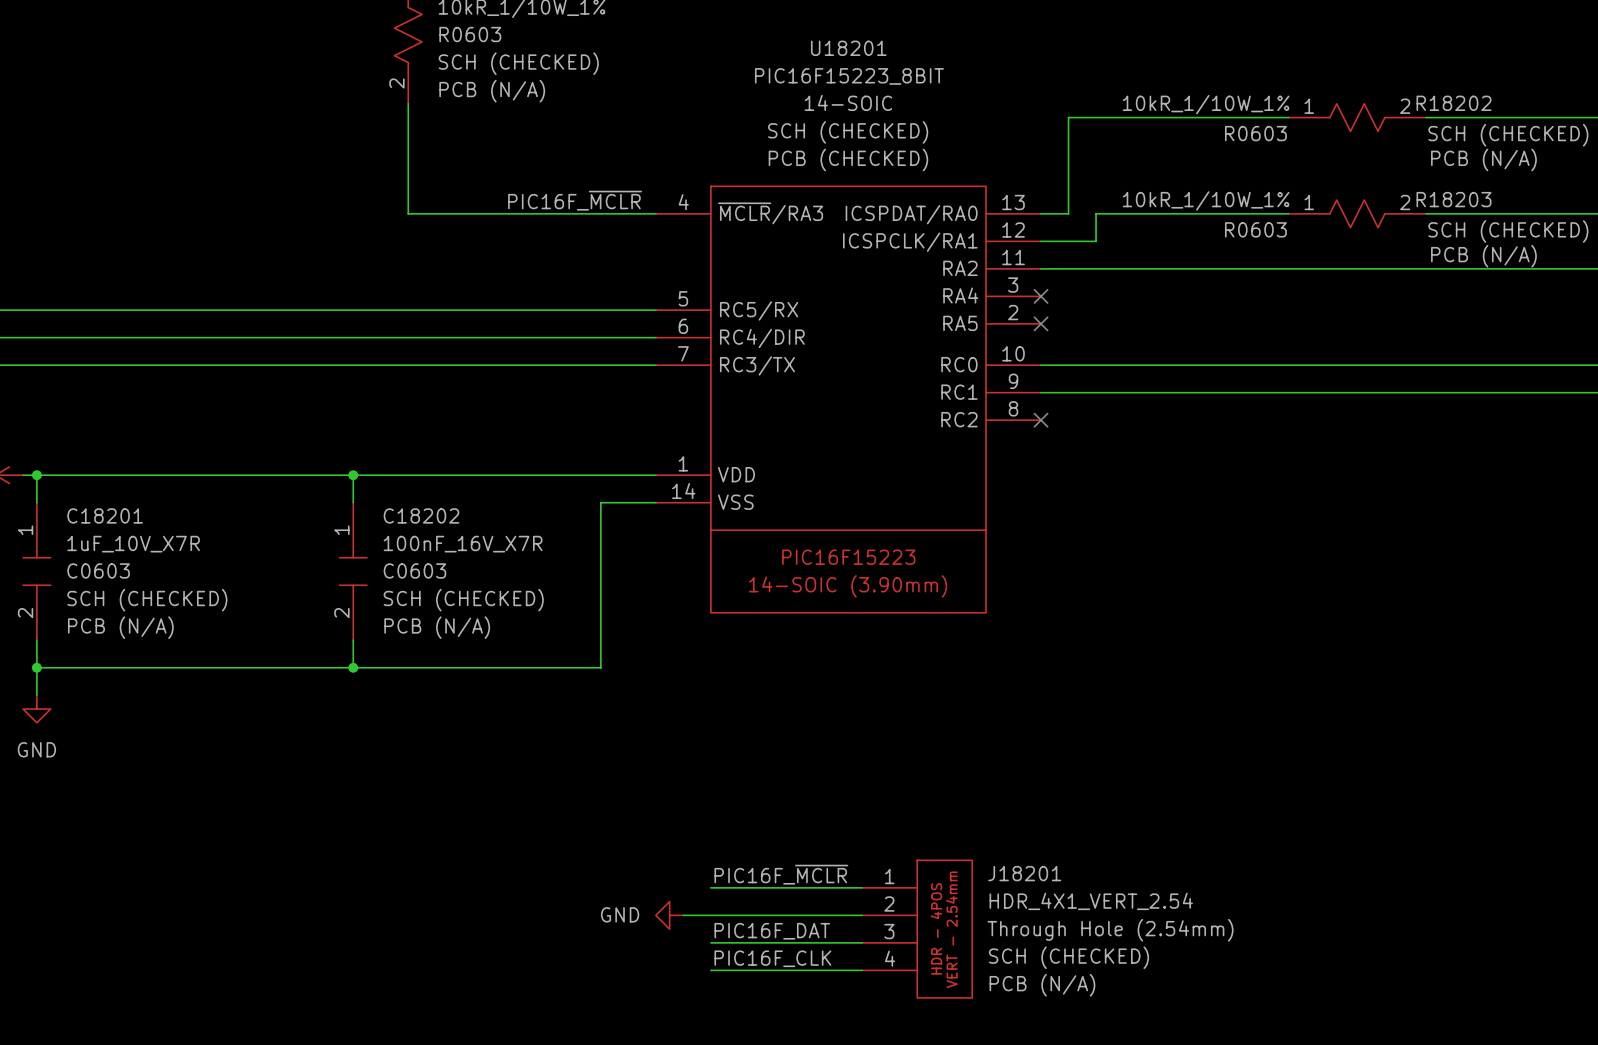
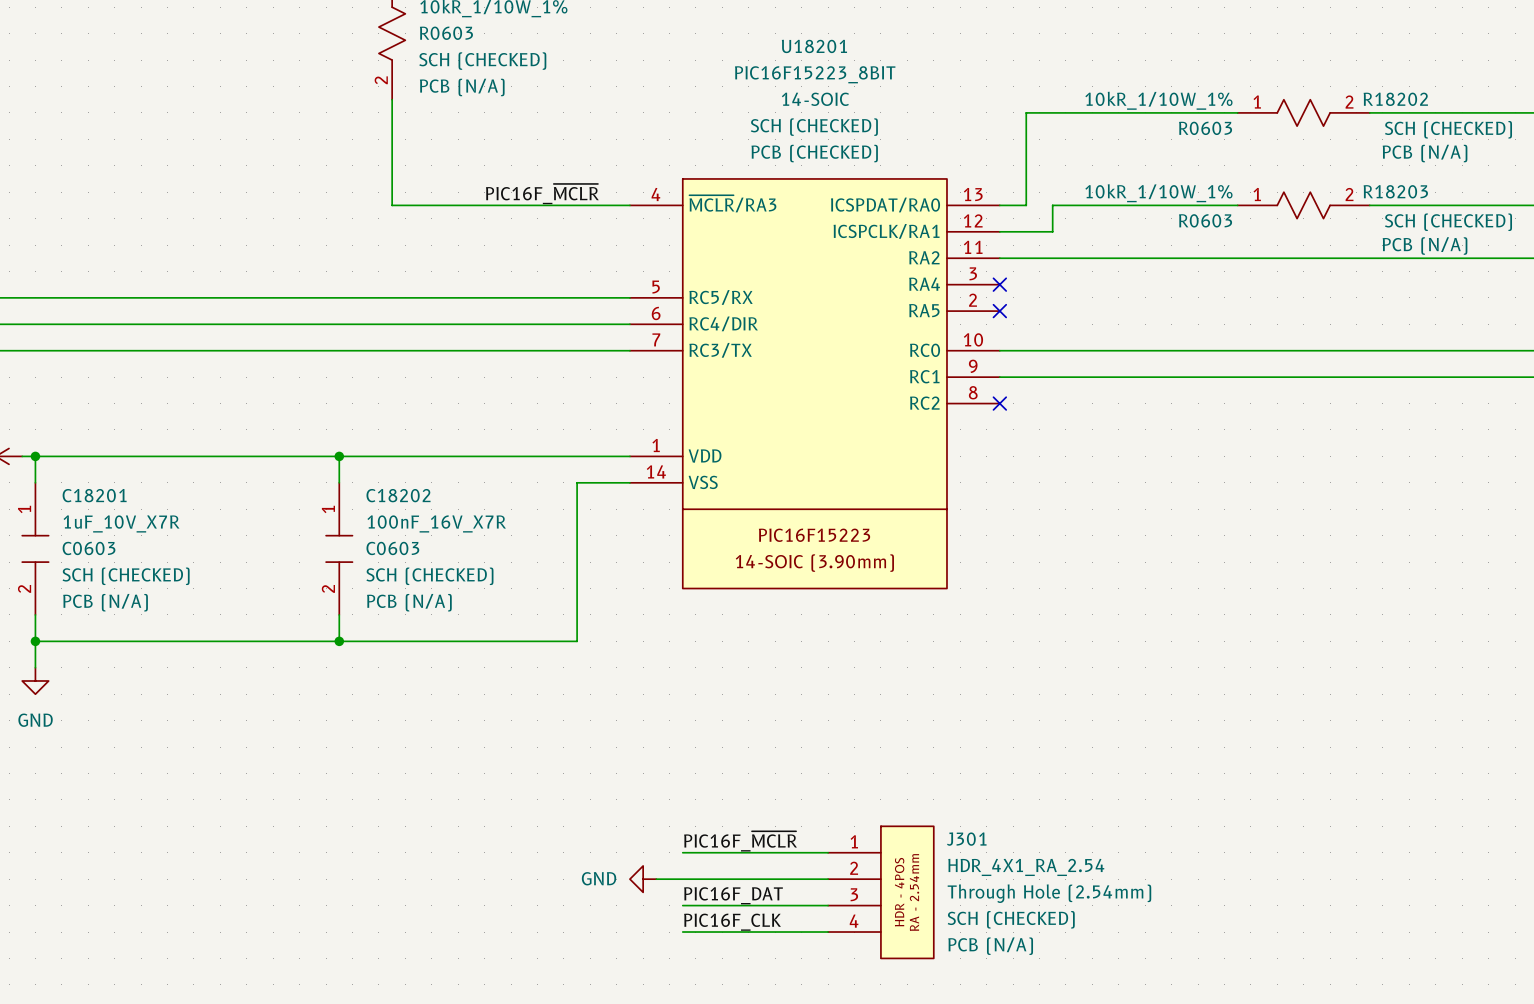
J18201 name: J18201 (1024, 873) -> J301 (966, 839)
J18201 value: HDR_4X1_VERT_2.54 (1091, 901) -> HDR_4X1_RA_2.54 (1026, 867)
J18201 text: VERT - 2.54mm (951, 929) -> RA - 2.54mm (914, 892)

